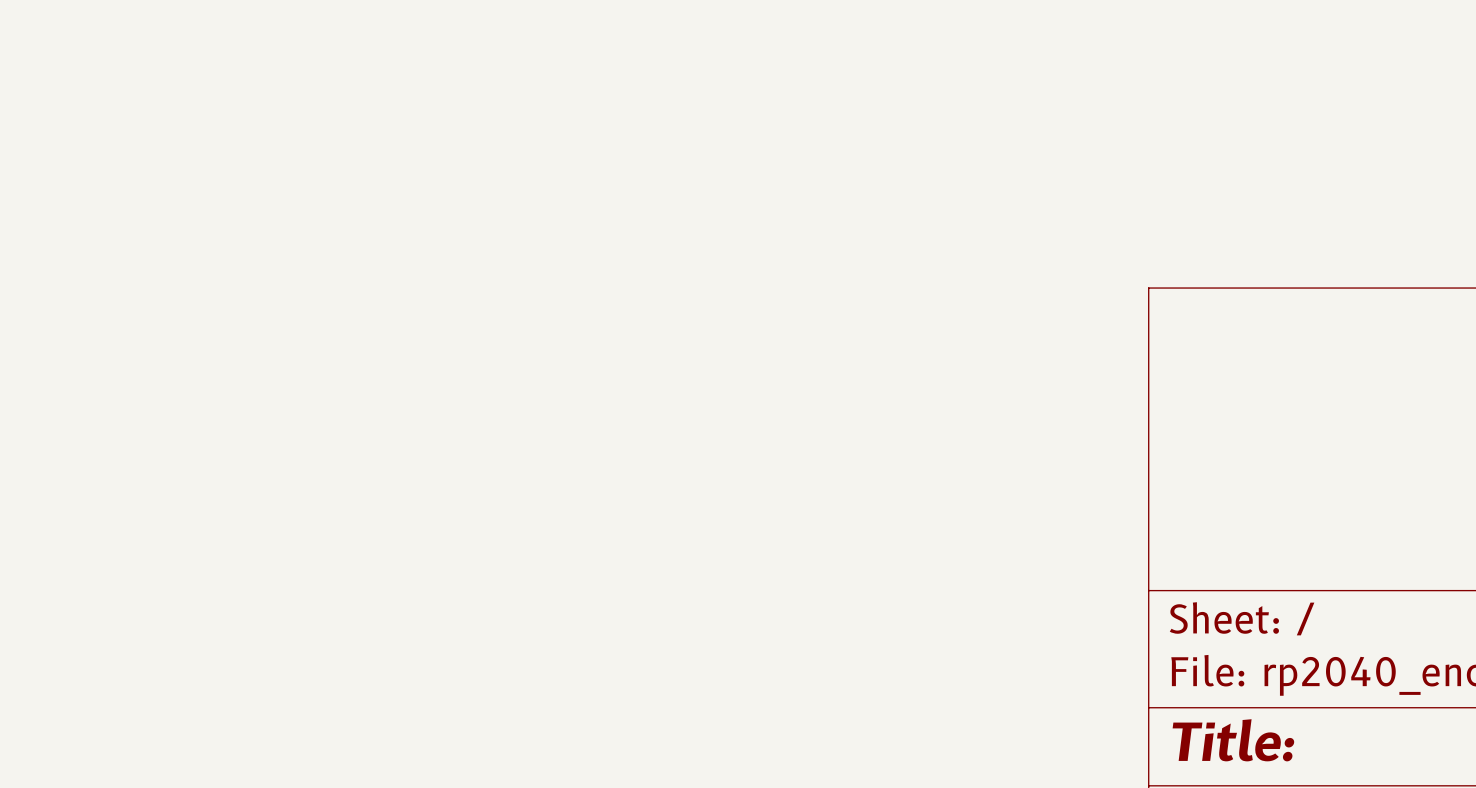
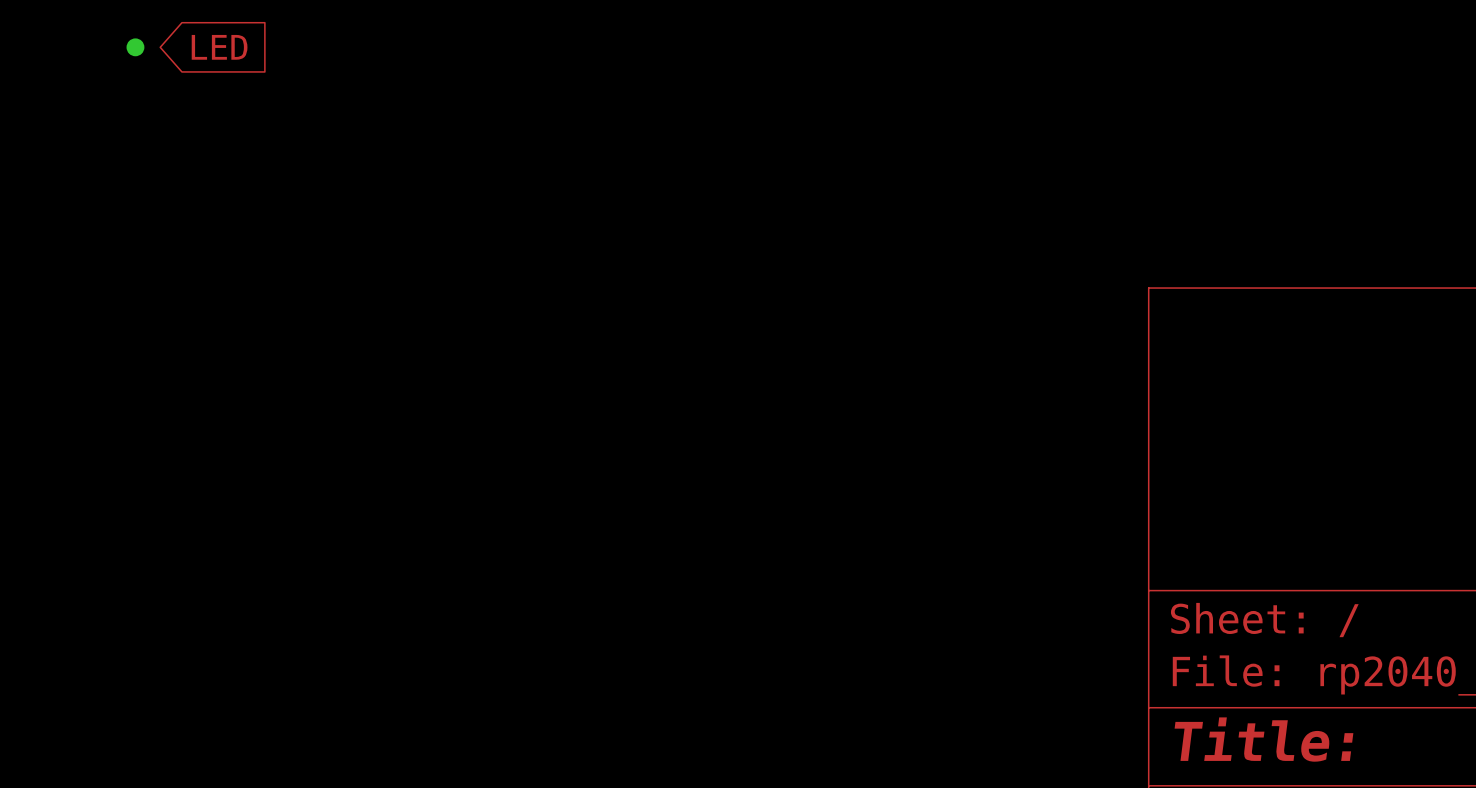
junction: none -> (135, 47)
global label: none -> LED (219, 47)

